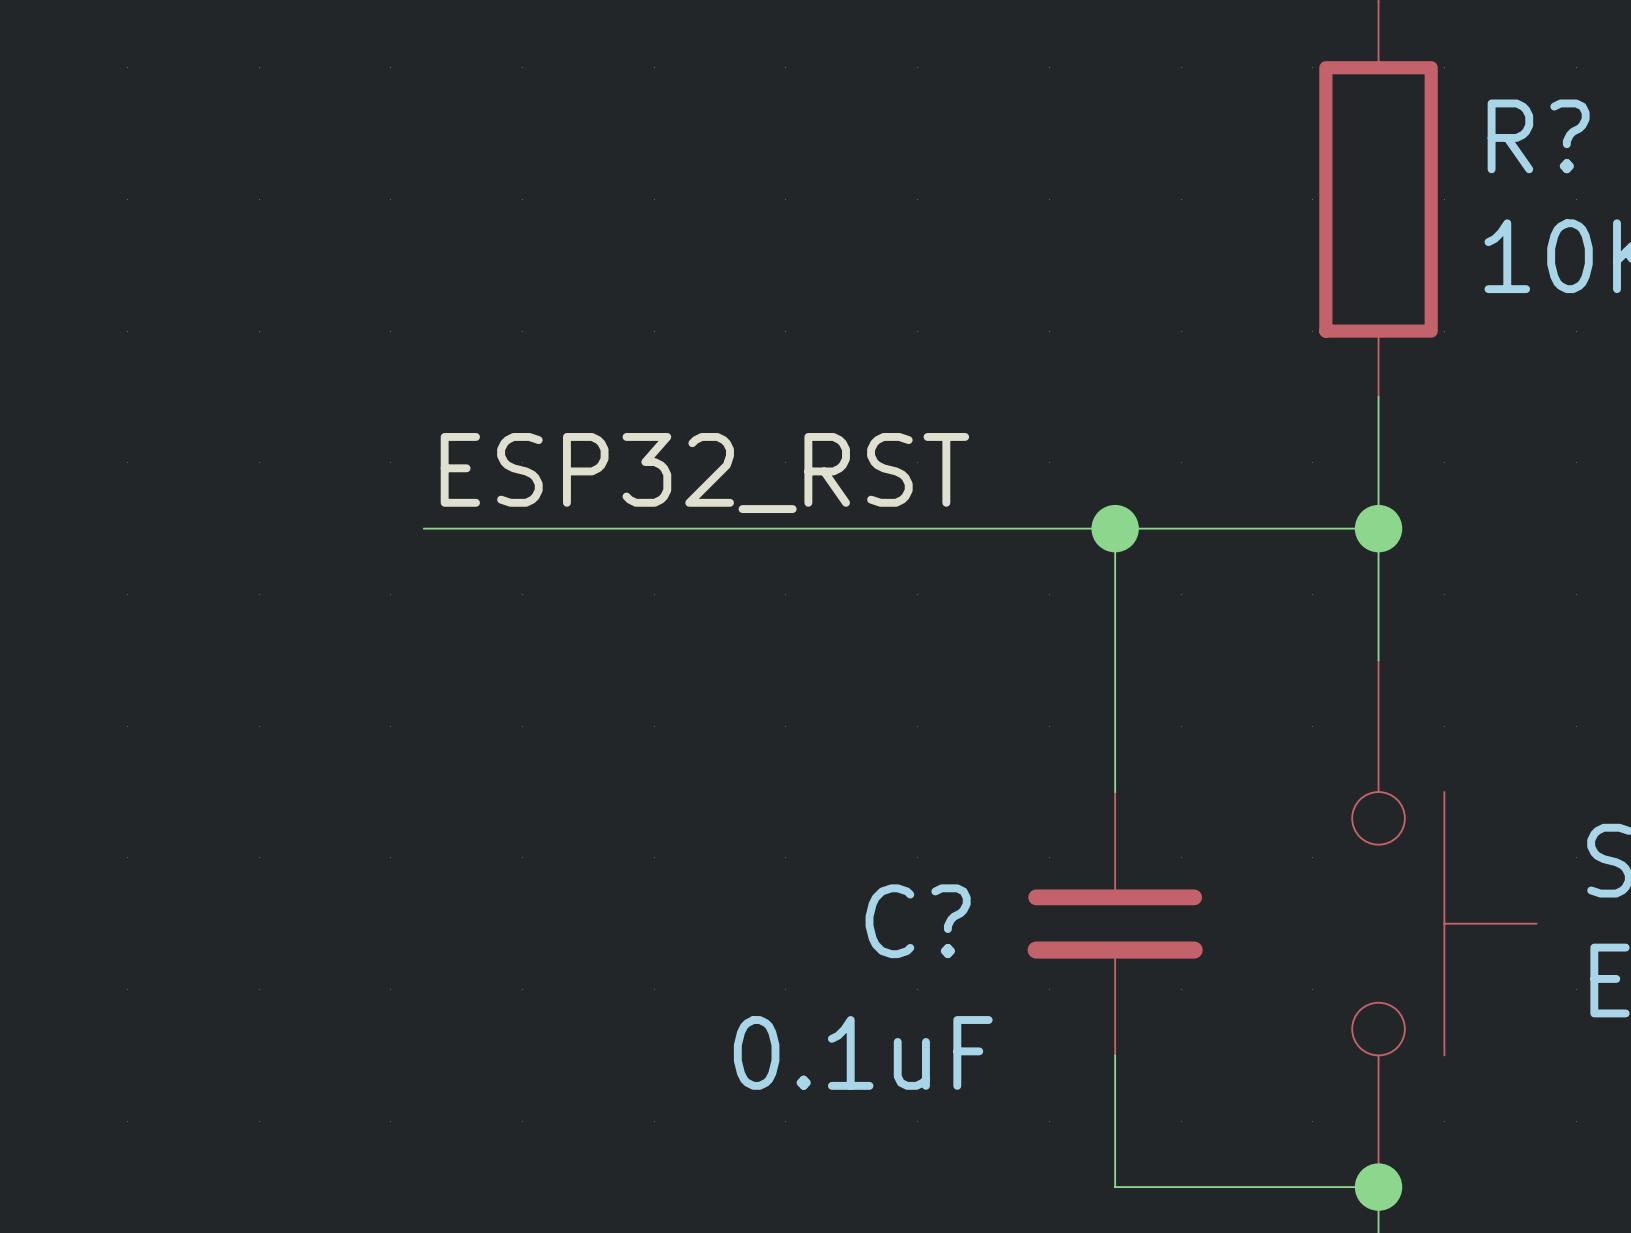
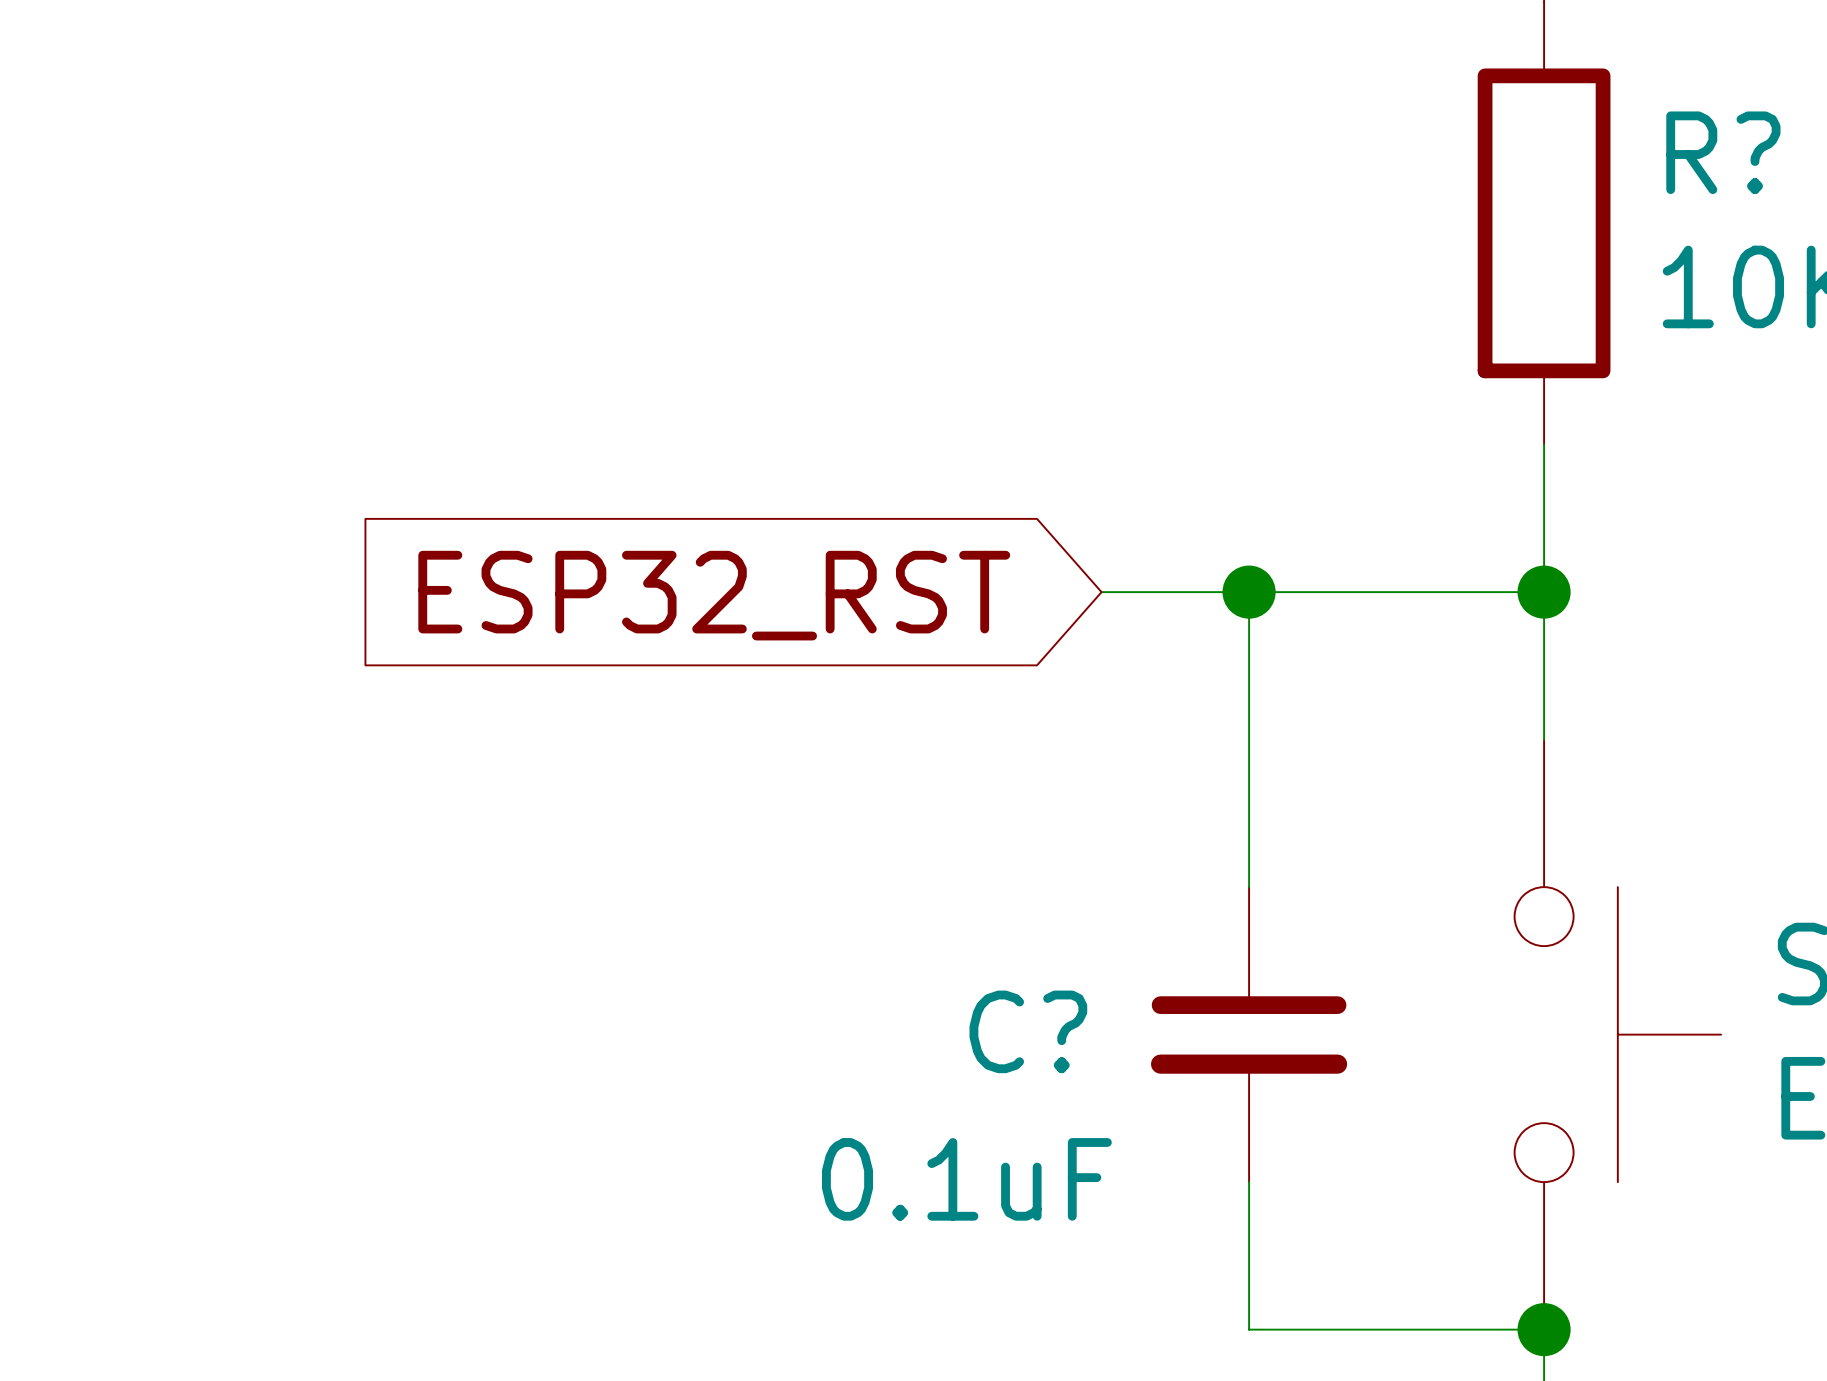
label: ESP32_RST (704, 473) -> none
wire: (423, 528) (983, 528) -> none
global label: none -> ESP32_RST (714, 595)

